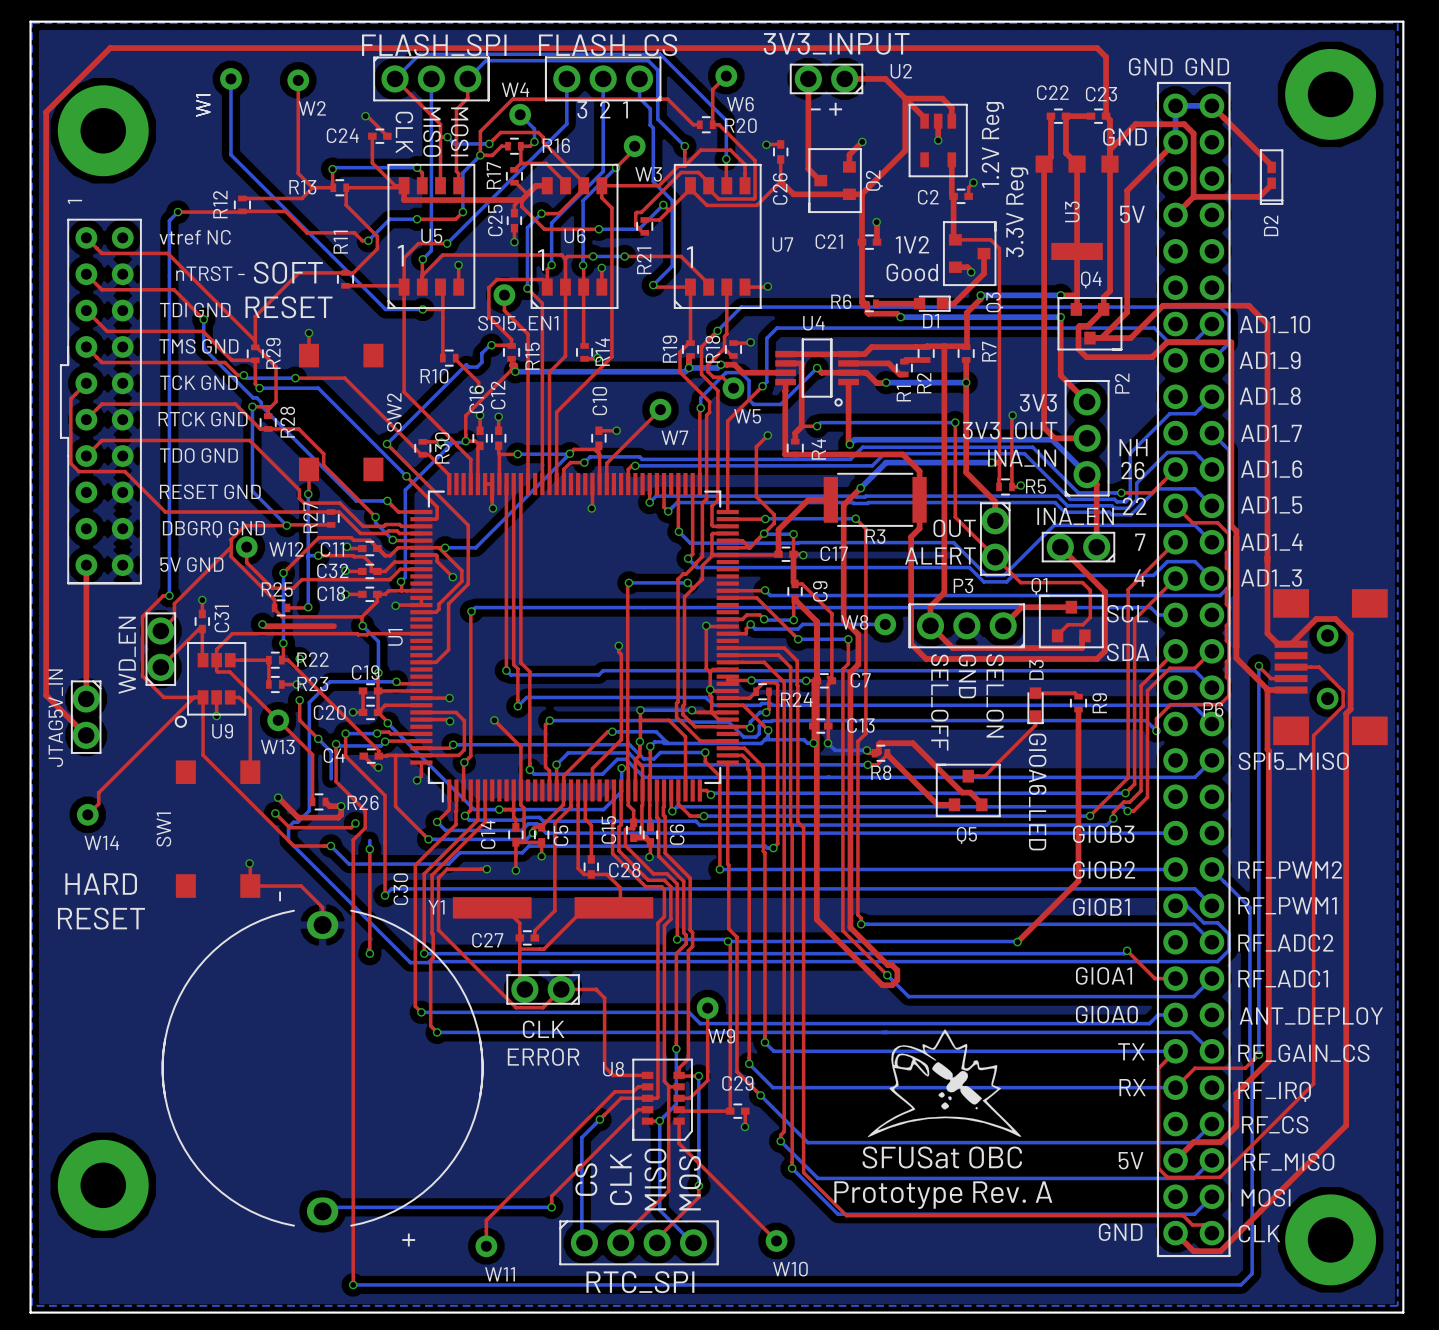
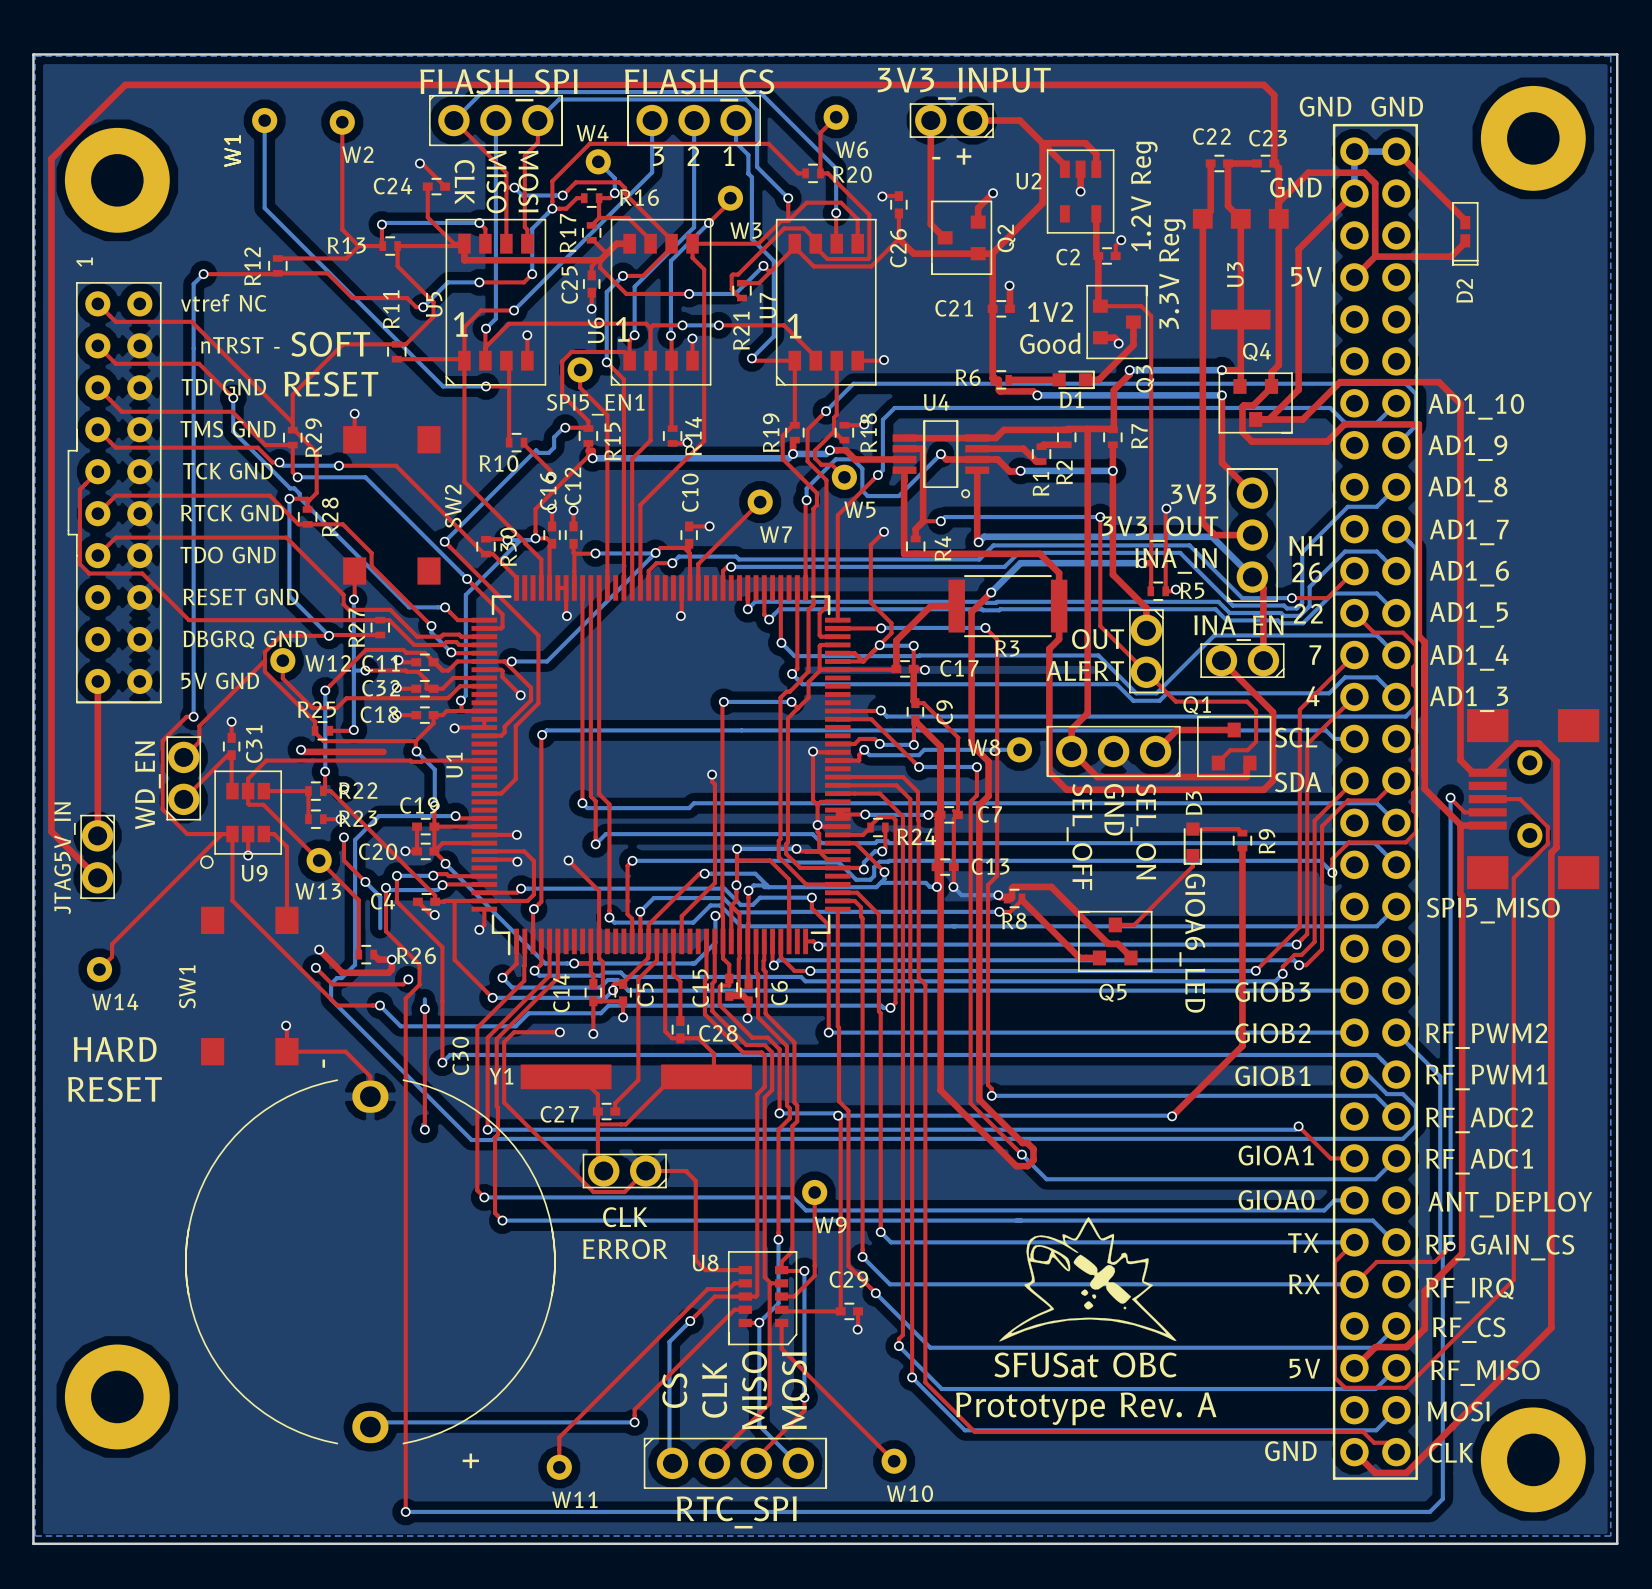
U2 name position: U2 (901, 71) -> U2 (1028, 181)
U5 name rotation: 0° (431, 235) -> 90° counterclockwise (434, 304)
U5 name position: U5 (431, 235) -> U5 (434, 304)
U6 name rotation: 0° (574, 235) -> 90° counterclockwise (596, 330)
U6 name position: U6 (574, 235) -> U6 (596, 330)
U7 name rotation: 0° (782, 244) -> 90° counterclockwise (767, 305)
U7 name position: U7 (782, 244) -> U7 (767, 305)
R18 name position: R18 (712, 349) -> R18 (868, 432)
P2 name: P2 (1122, 383) -> none
P3 name: P3 (963, 585) -> none
P6 name: P6 (1213, 709) -> none

